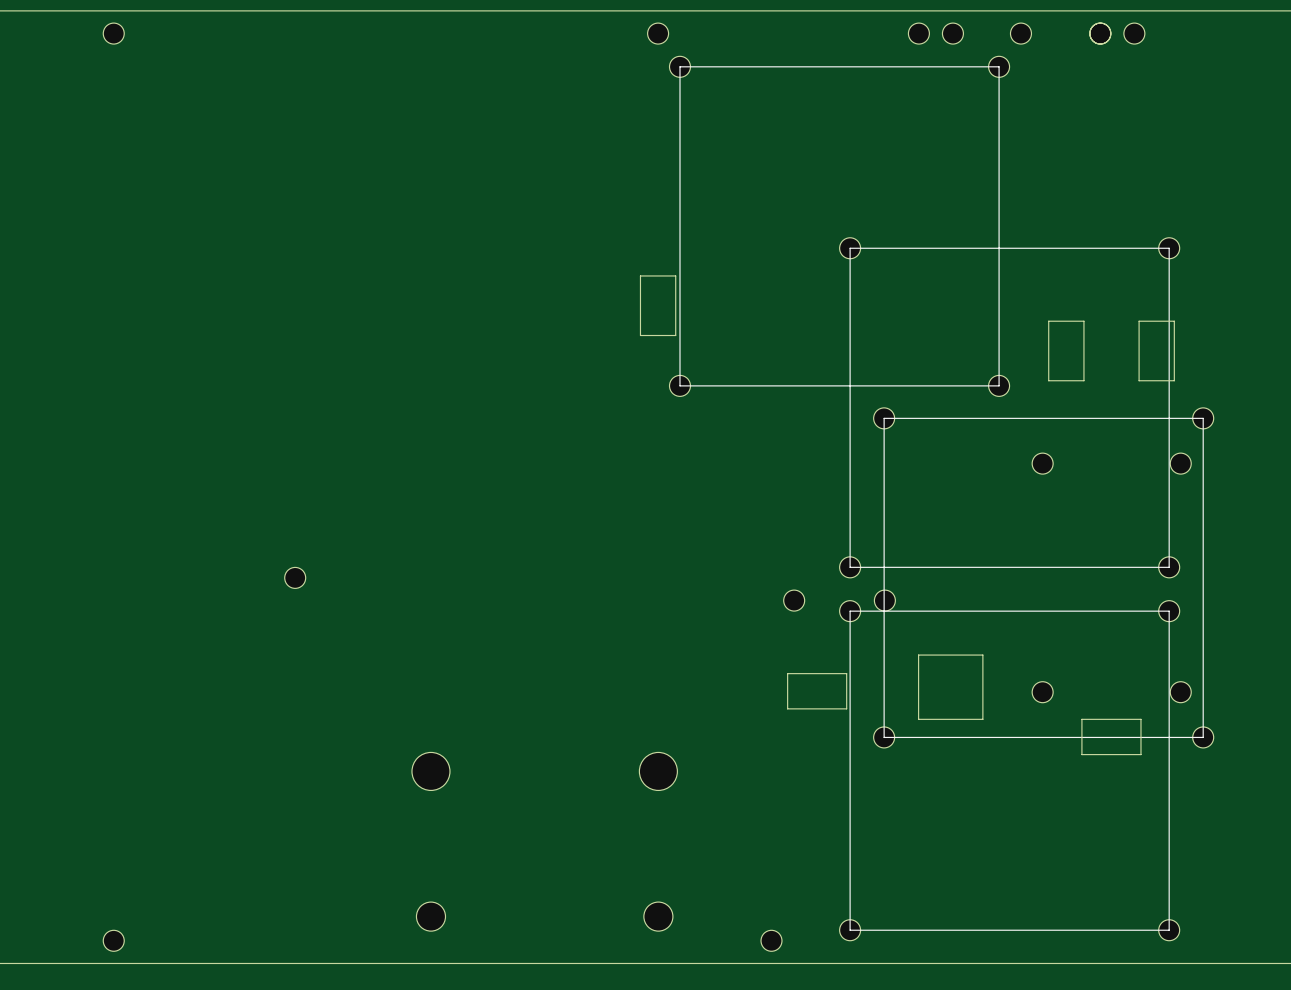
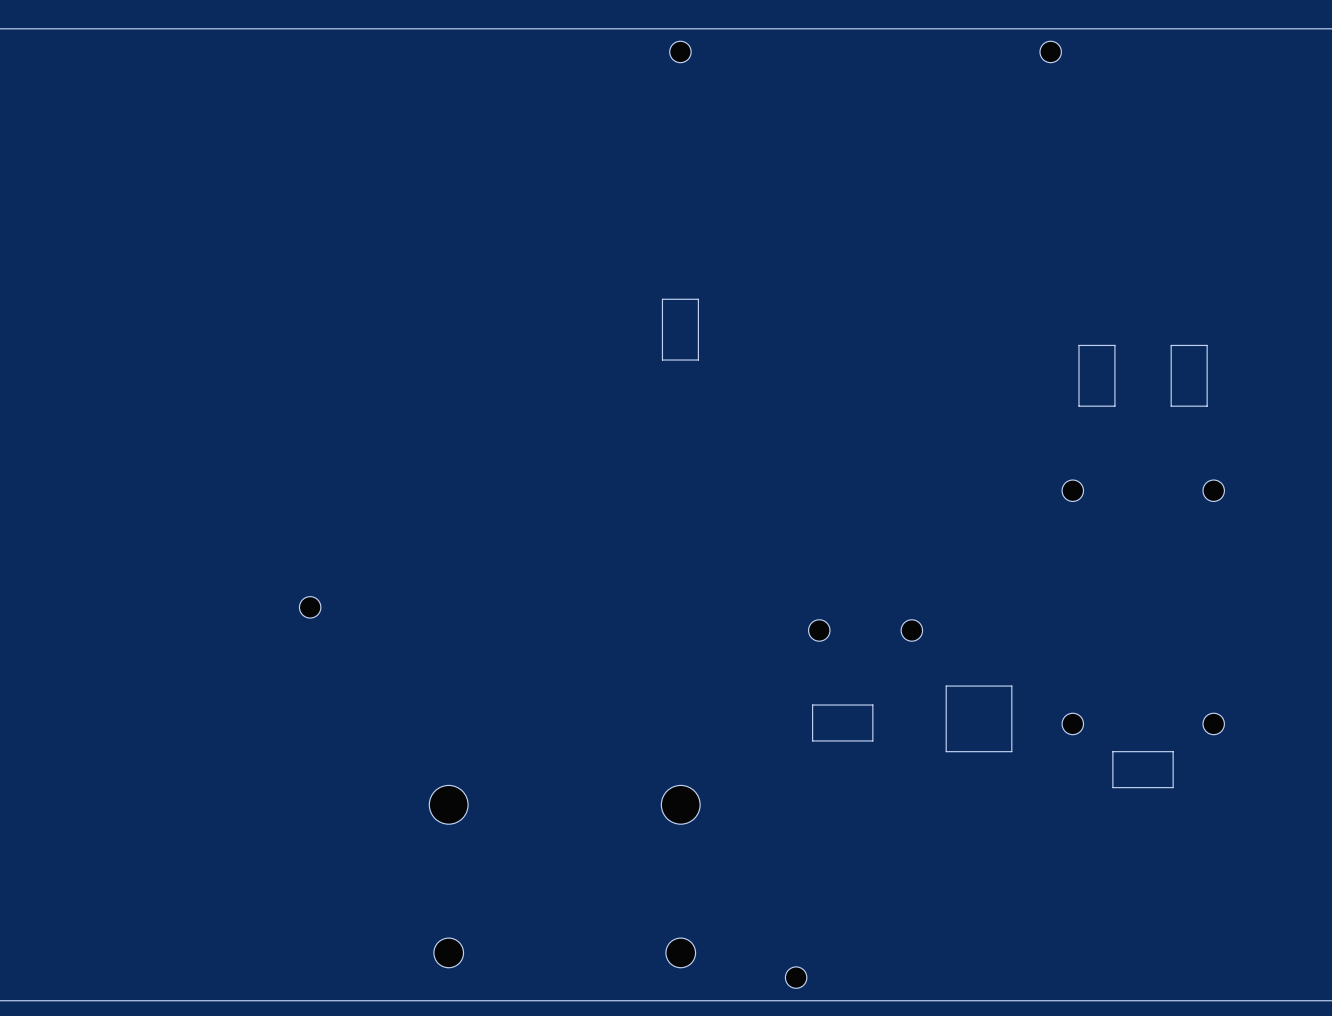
part: (113, 33) -> none
part: (918, 33) -> none
part: (952, 33) -> none
part: (1100, 33) -> none
part: (1134, 33) -> none
part: (839, 226) -> none
part: (1009, 407) -> none
part: (1043, 577) -> none
part: (1009, 770) -> none
part: (113, 940) -> none

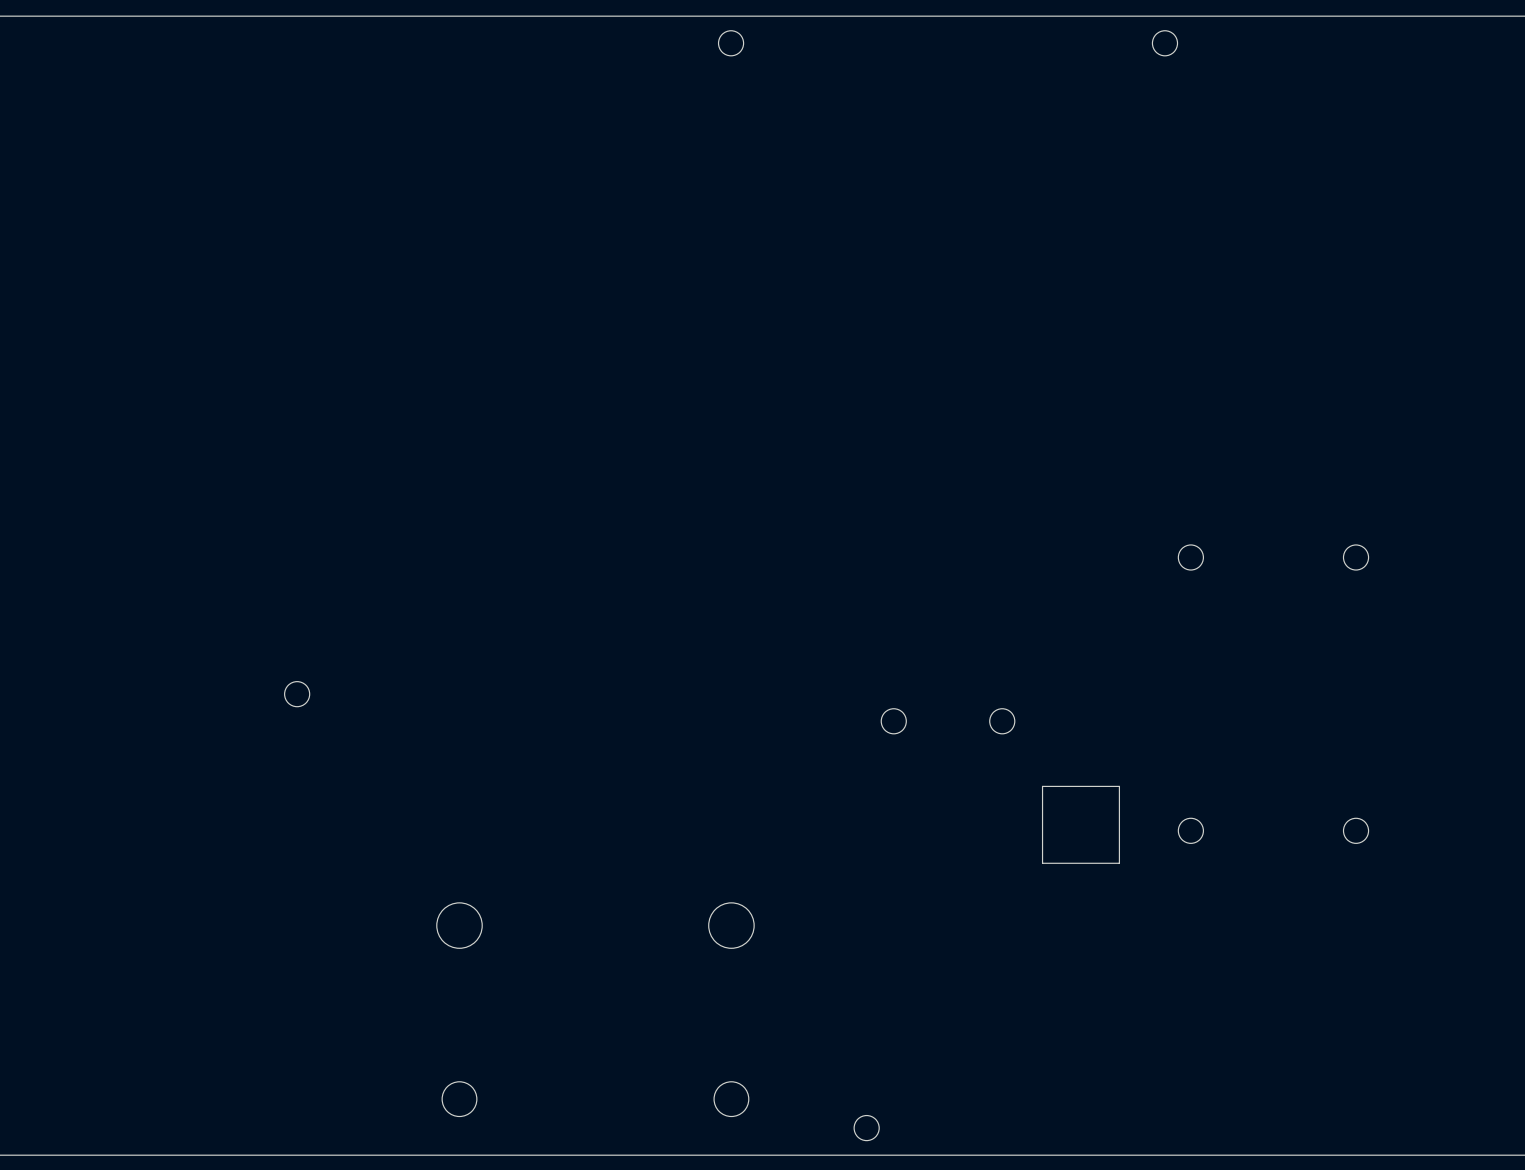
board edge: (662, 299) (662, 360) (698, 360) (698, 299) (662, 299) -> none
board edge: (1078, 345) (1078, 406) (1114, 406) (1114, 345) (1078, 345) -> none
board edge: (1171, 345) (1171, 406) (1207, 406) (1207, 345) (1171, 345) -> none
board edge: (812, 705) (872, 705) (872, 740) (812, 740) (812, 705) -> none
board edge: (1112, 751) (1112, 787) (1173, 787) (1173, 751) (1112, 751) -> none

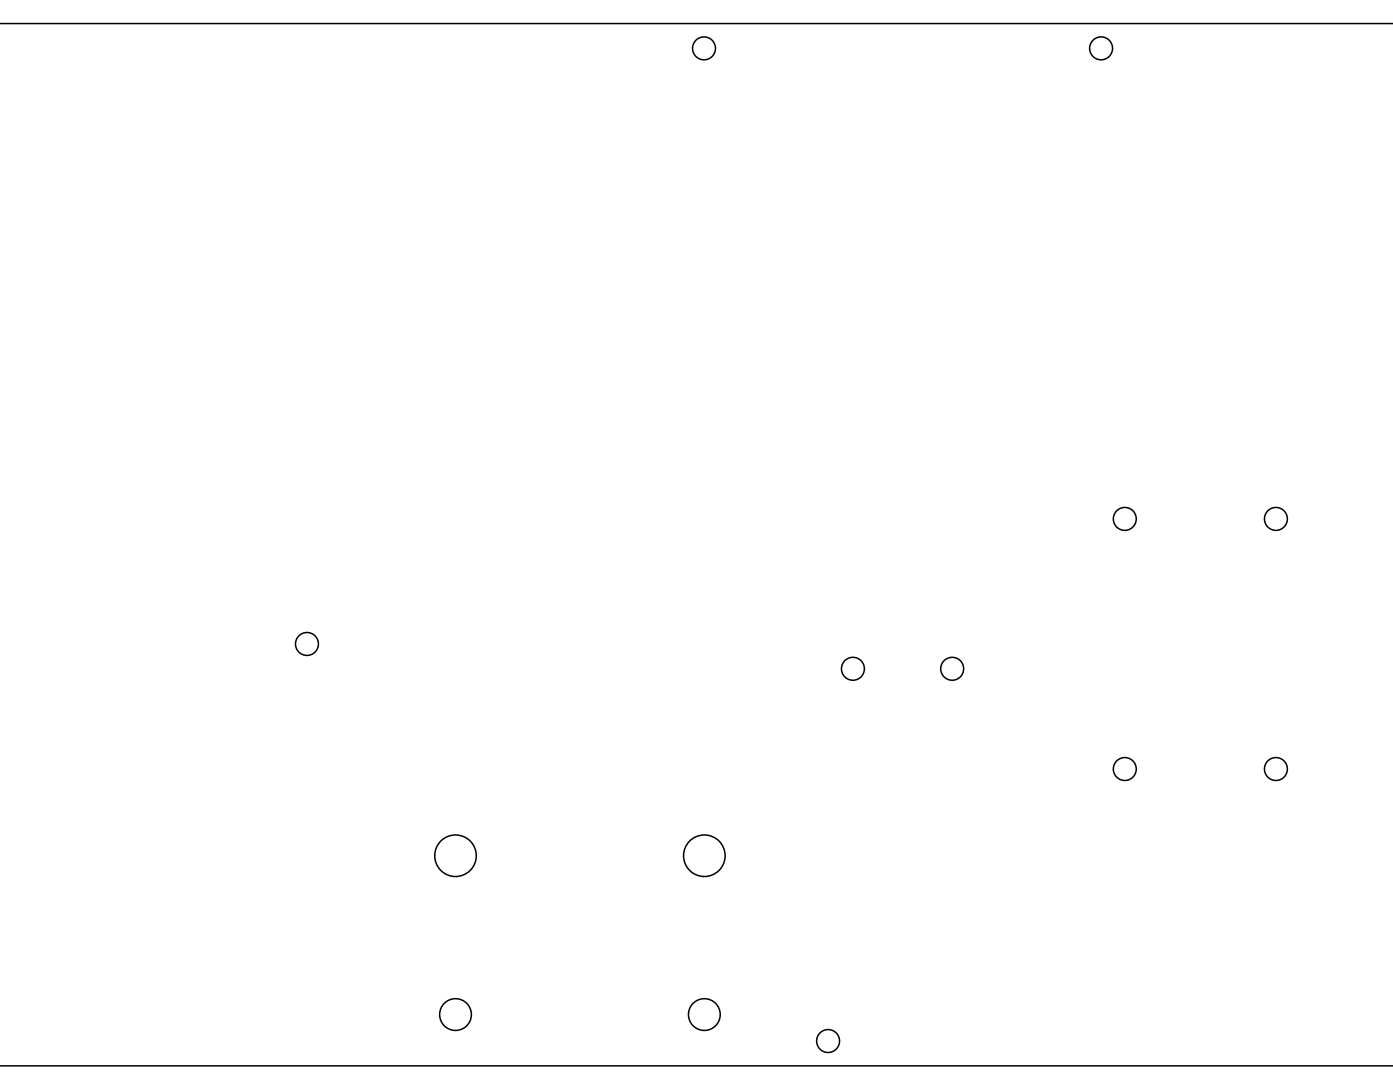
board edge: (1042, 786) (1042, 863) (1119, 863) (1119, 786) (1042, 786) -> none

